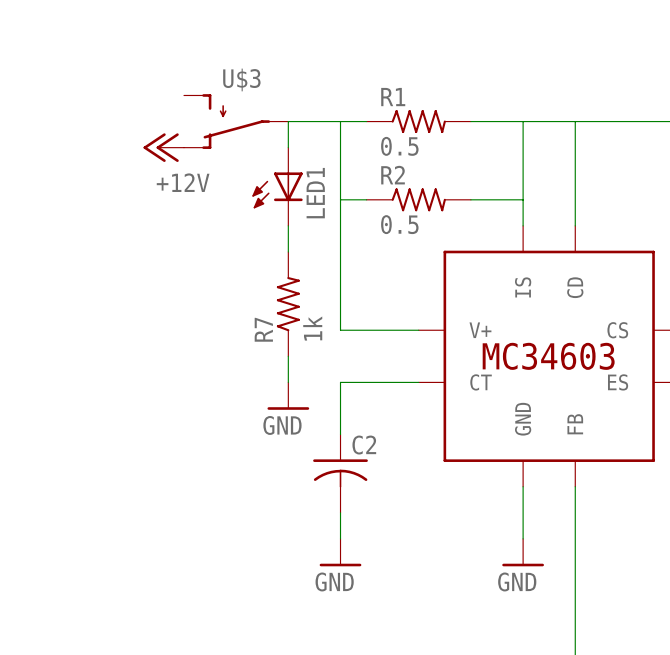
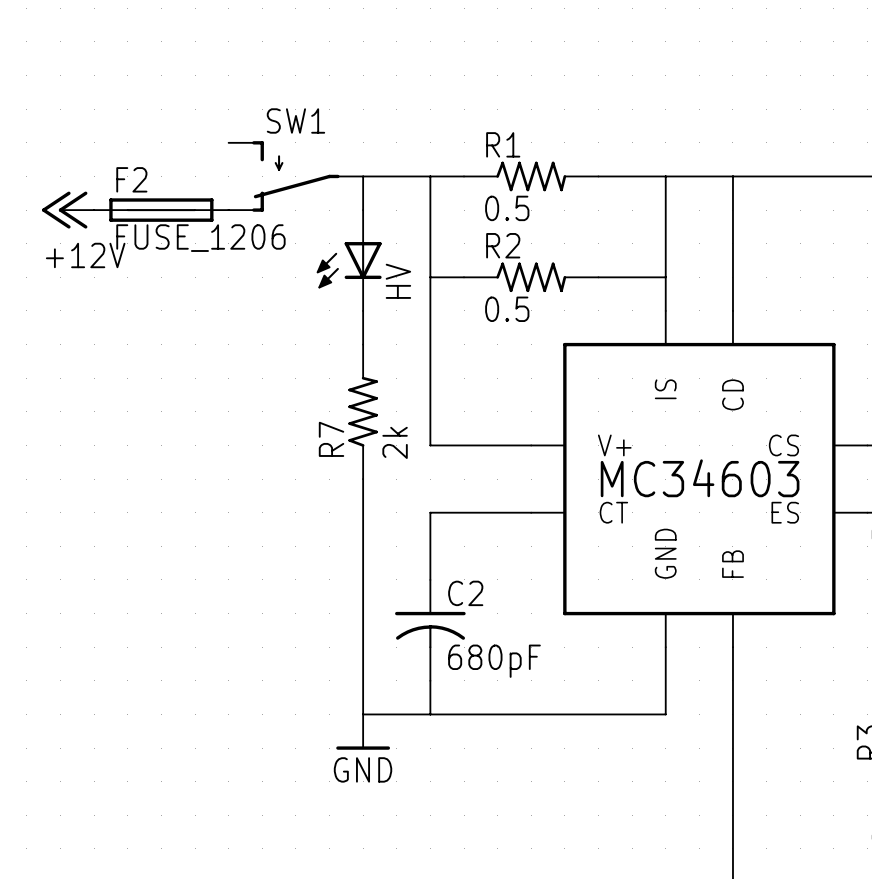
U$3 name: U$3 (241, 79) -> SW1 (295, 120)
F2: none -> FUSE_1206 (161, 210)
power symbol position: +12V (163, 147) -> +12V (68, 210)
LED1 name: LED1 (315, 193) -> HV (398, 281)
R7 value: 1k (312, 328) -> 2k (395, 442)
wire: none -> (363, 512) (363, 714) (665, 714)
power symbol: GND (288, 396) -> none
C2 value: none -> 680pF (494, 661)
power symbol position: GND (340, 552) -> GND (363, 732)
power symbol: GND (523, 552) -> none

